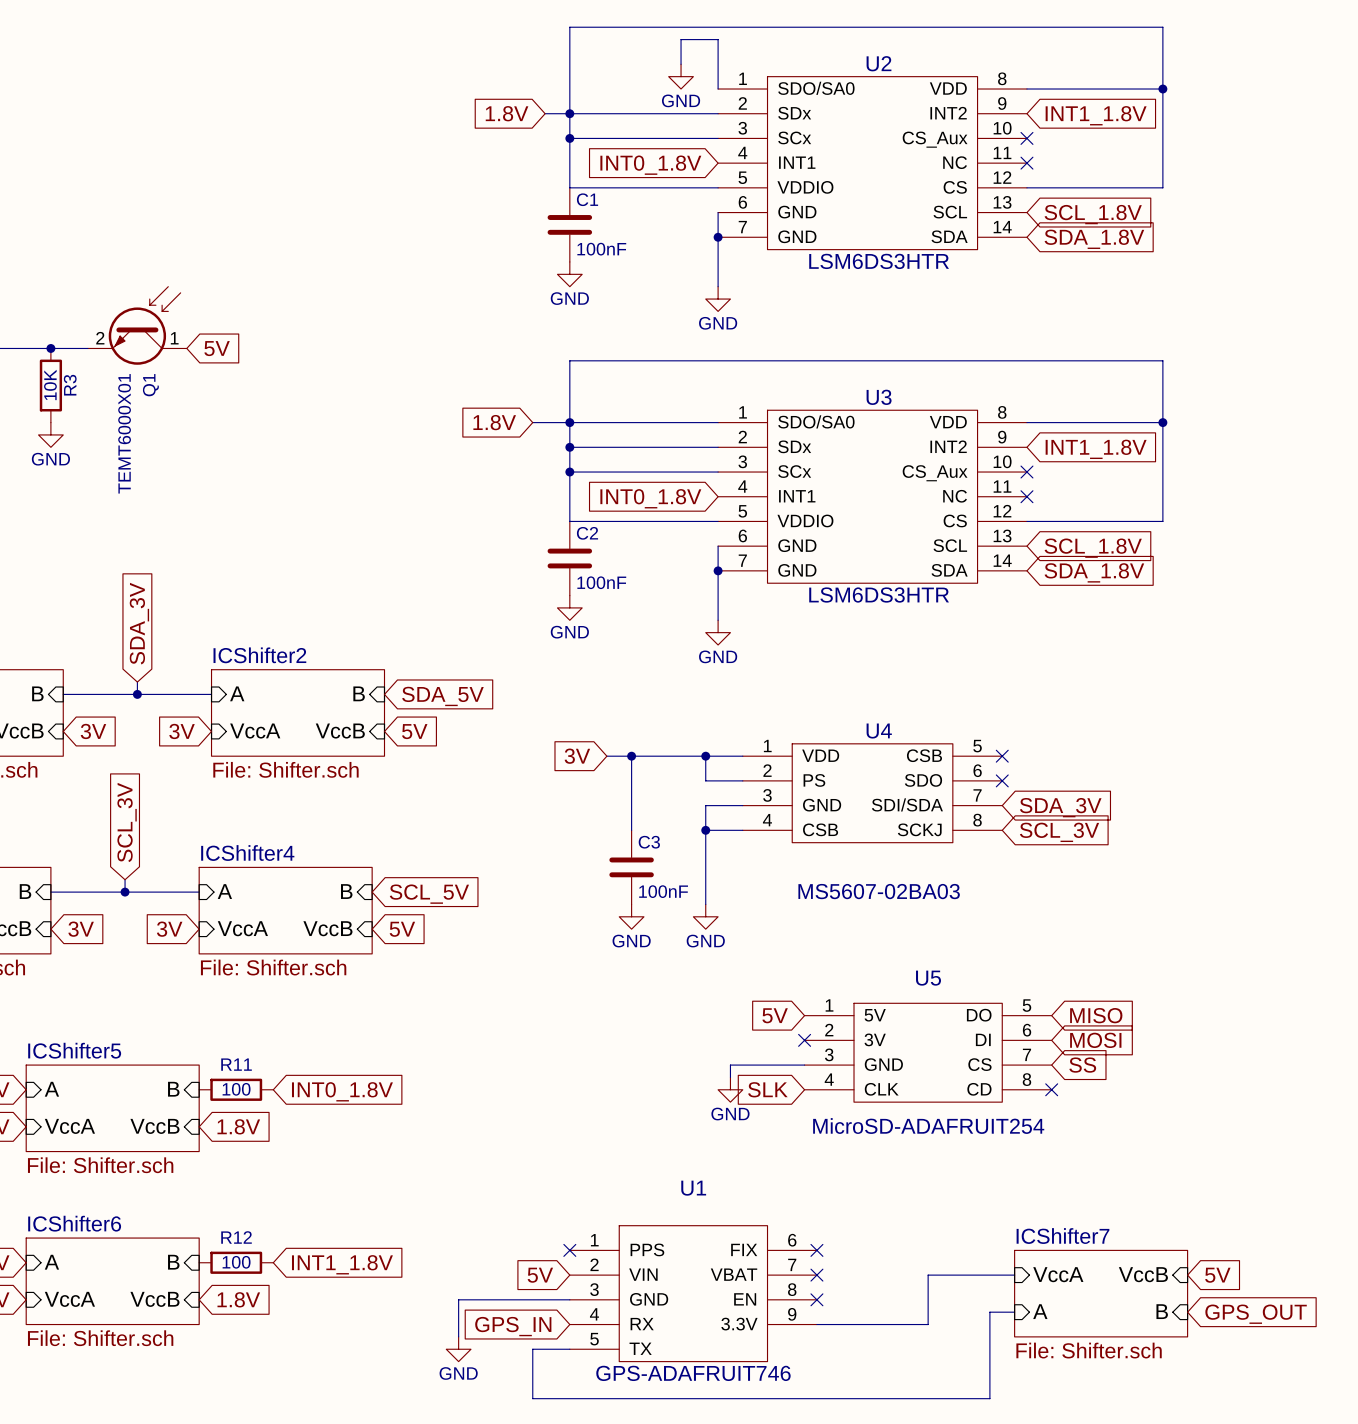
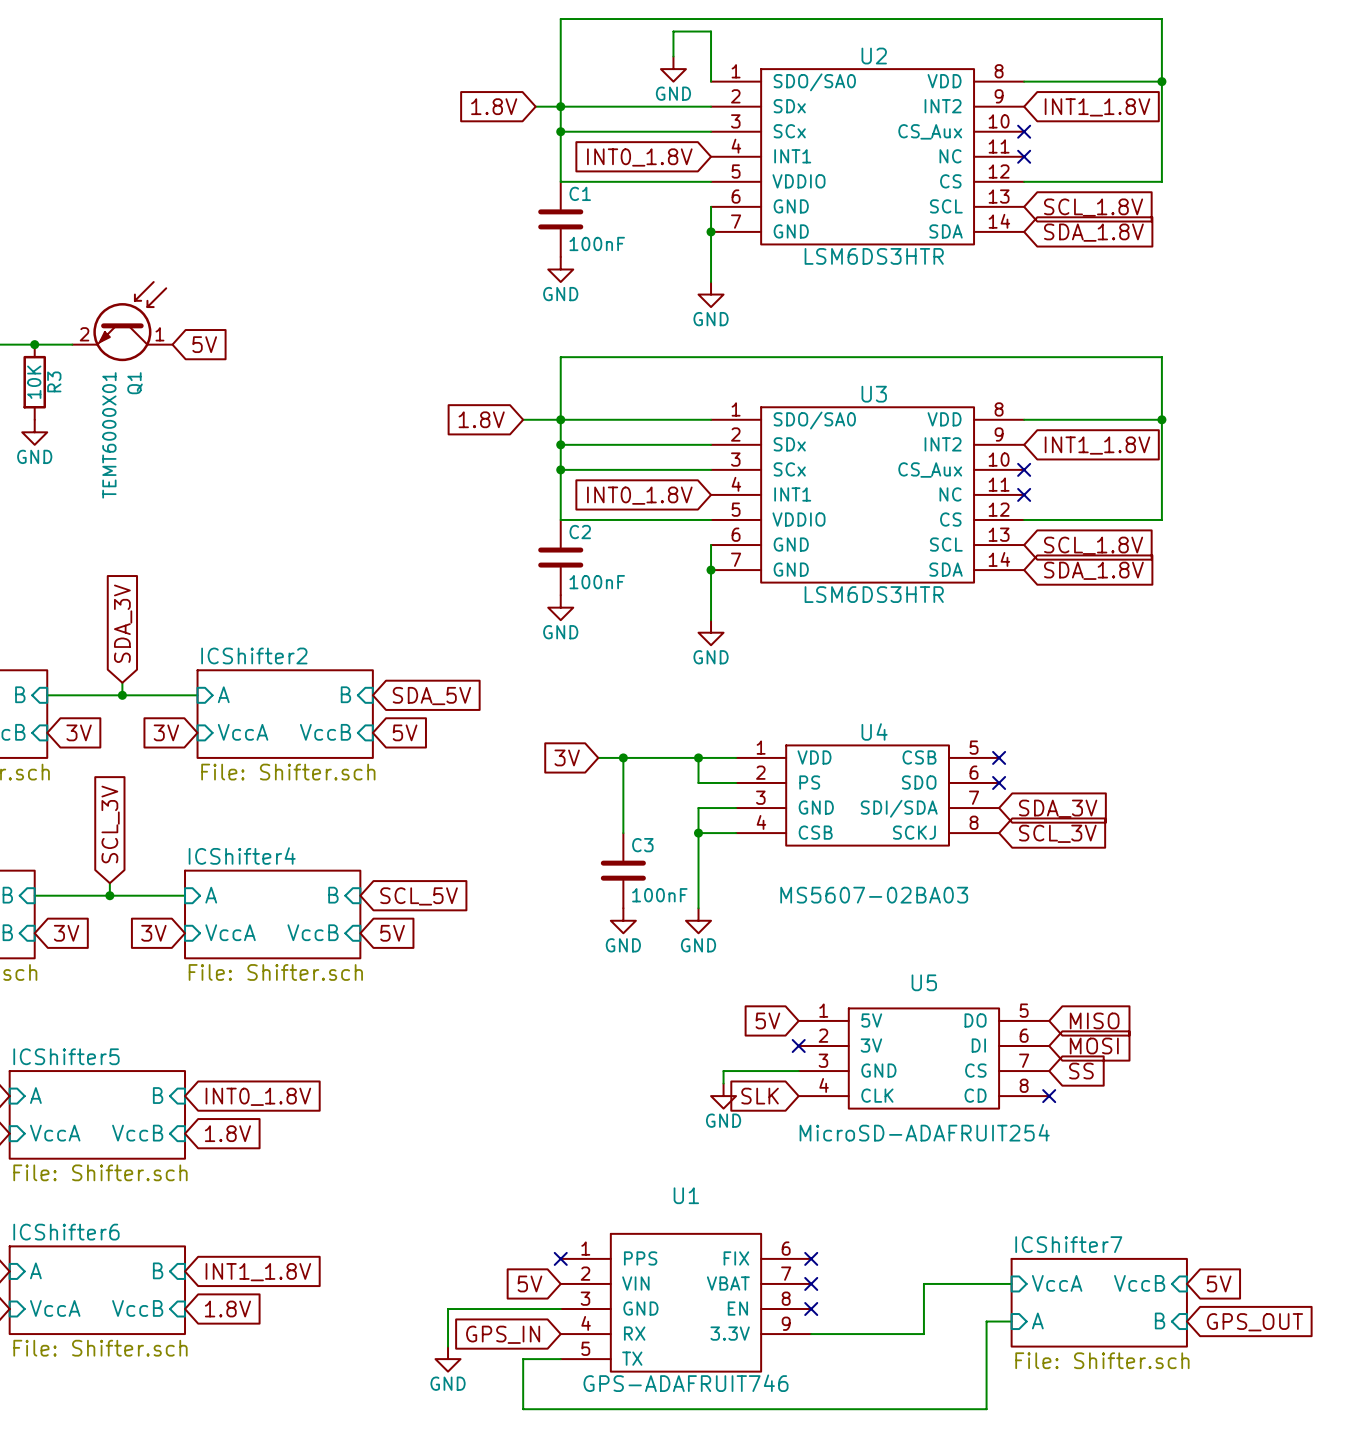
R11: 100 (236, 1089) -> none
global label position: INT0_1.8V (342, 1091) -> INT0_1.8V (258, 1096)
R12: 100 (236, 1262) -> none
global label position: INT1_1.8V (342, 1264) -> INT1_1.8V (258, 1272)

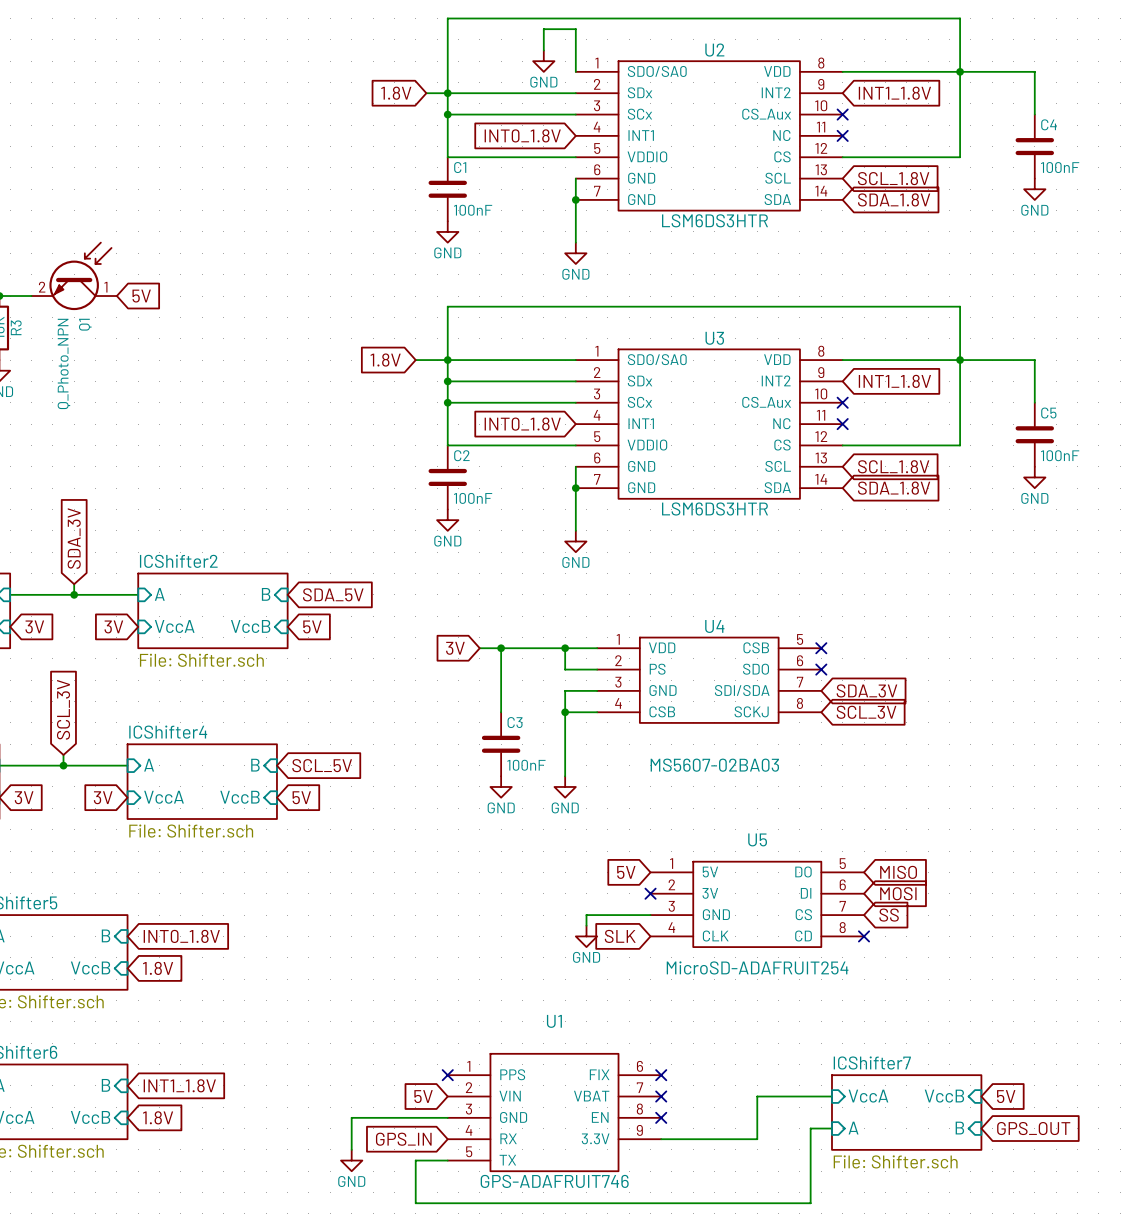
wire: none -> (960, 71) (1034, 71) (1034, 114)
C4: none -> 100nF (1034, 146)
power symbol: none -> GND (1034, 189)
wire: none -> (960, 360) (1034, 360) (1034, 402)
Q1 value: TEMT6000X01 (109, 435) -> Q_Photo_NPN (63, 363)
C5: none -> 100nF (1034, 434)
power symbol: none -> GND (1034, 477)

